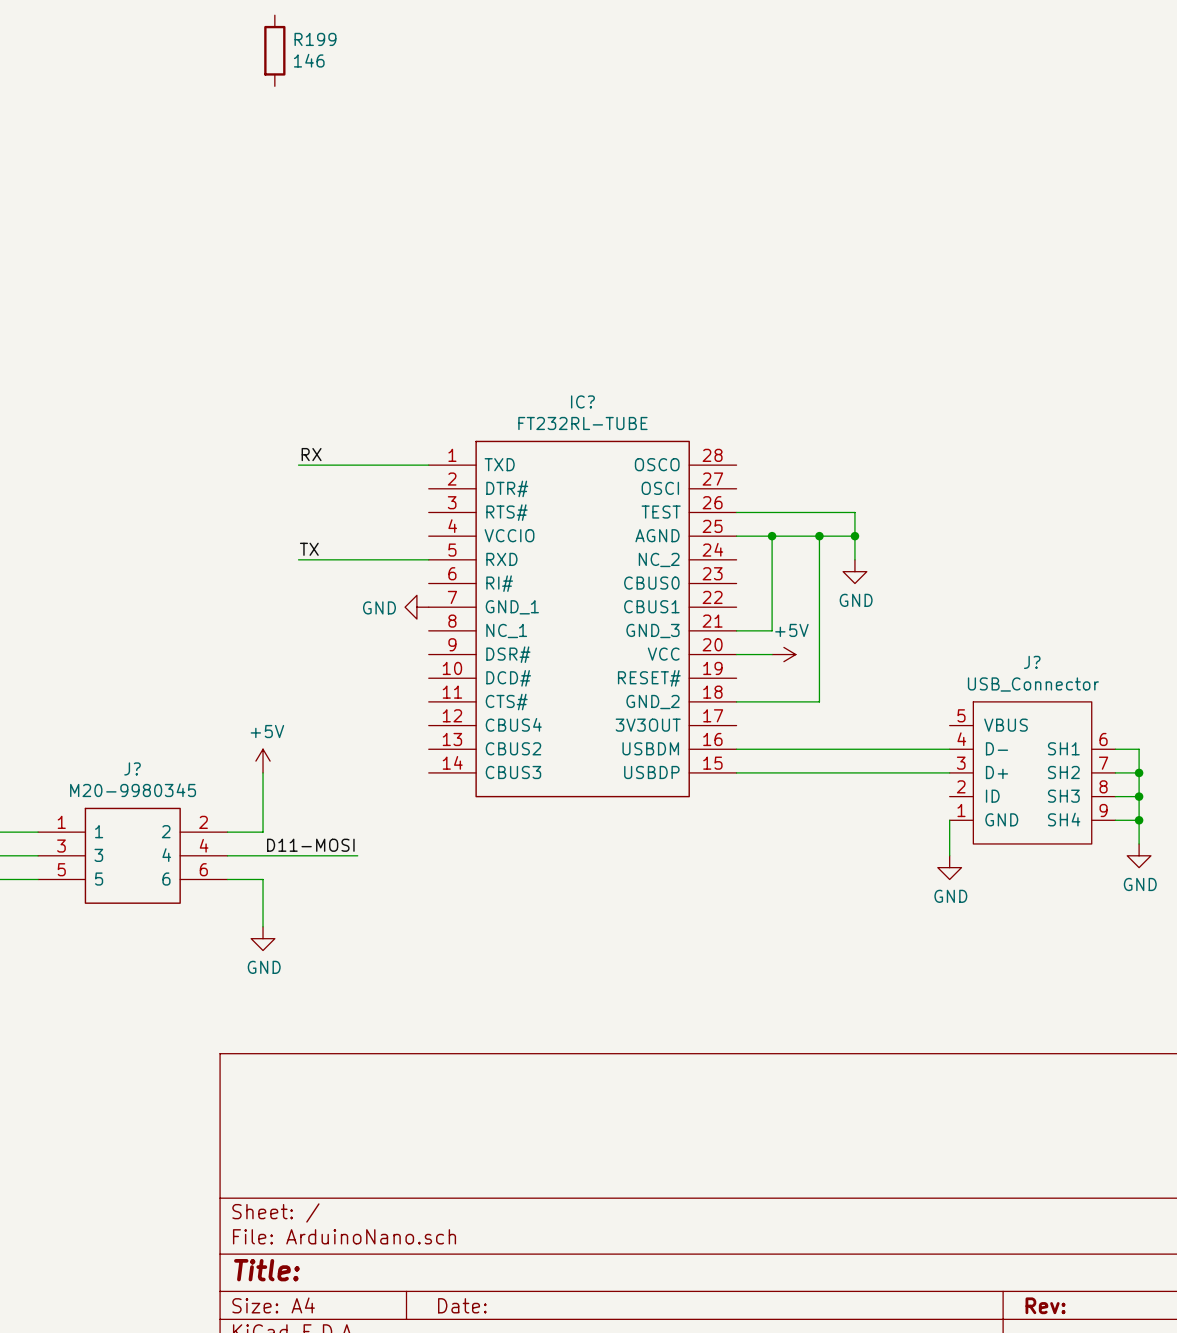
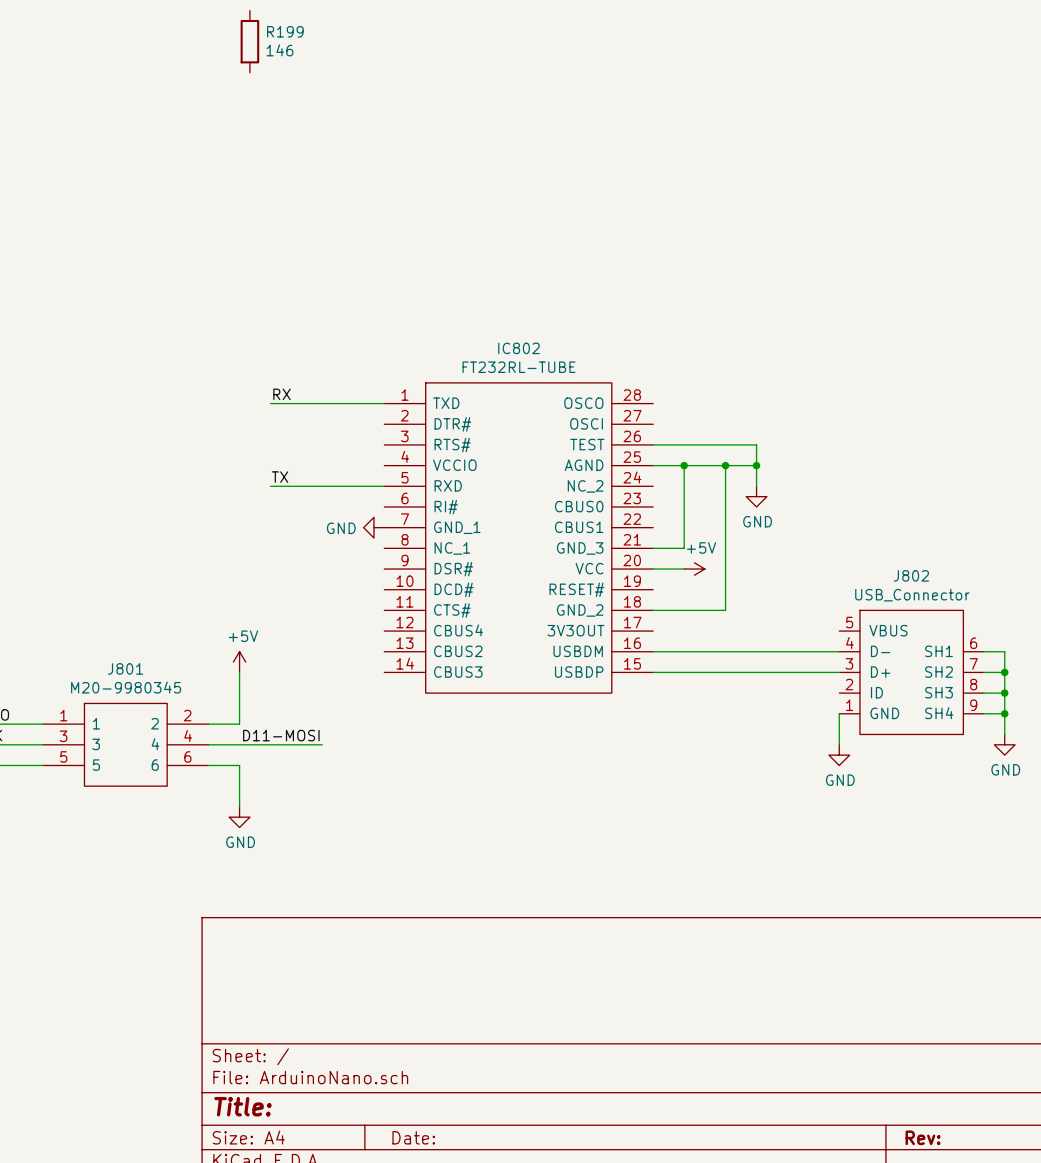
IC? name: IC? (582, 401) -> IC802 (518, 348)
J? name: J? (1032, 662) -> J802 (911, 575)
J? name: J? (132, 768) -> J801 (125, 668)

